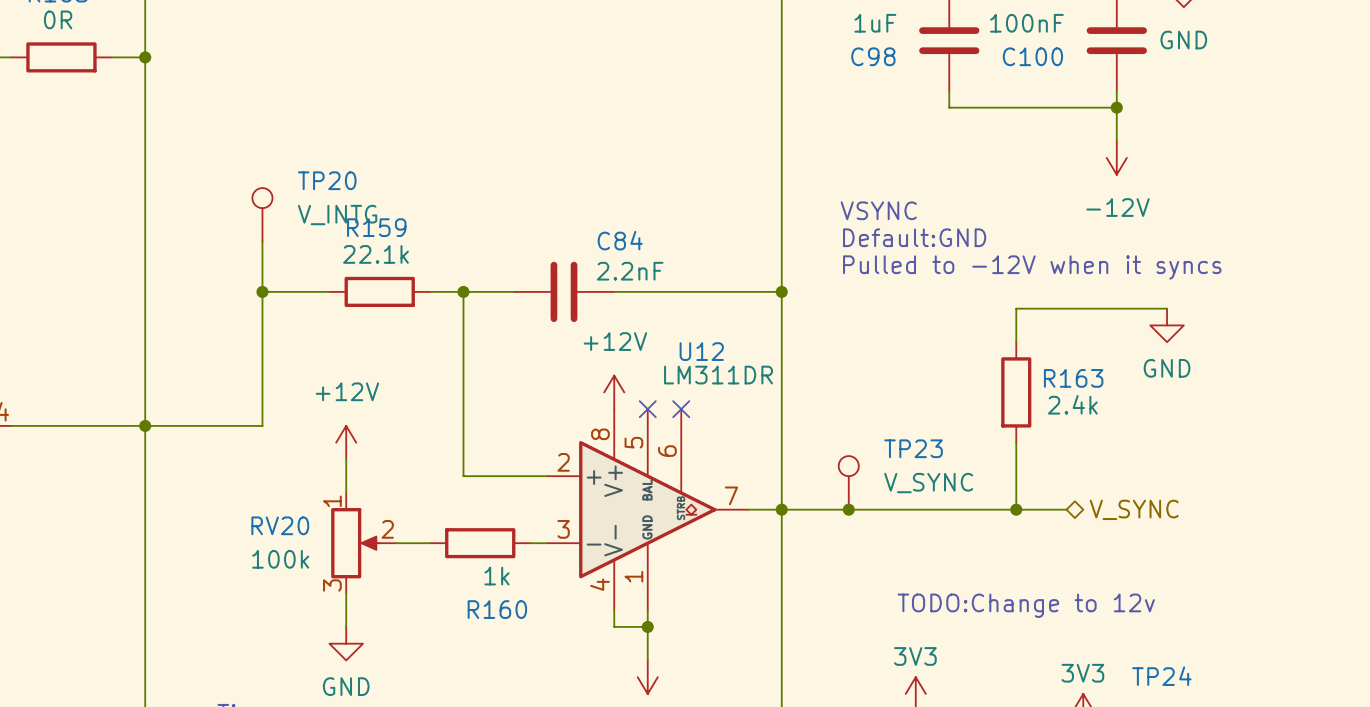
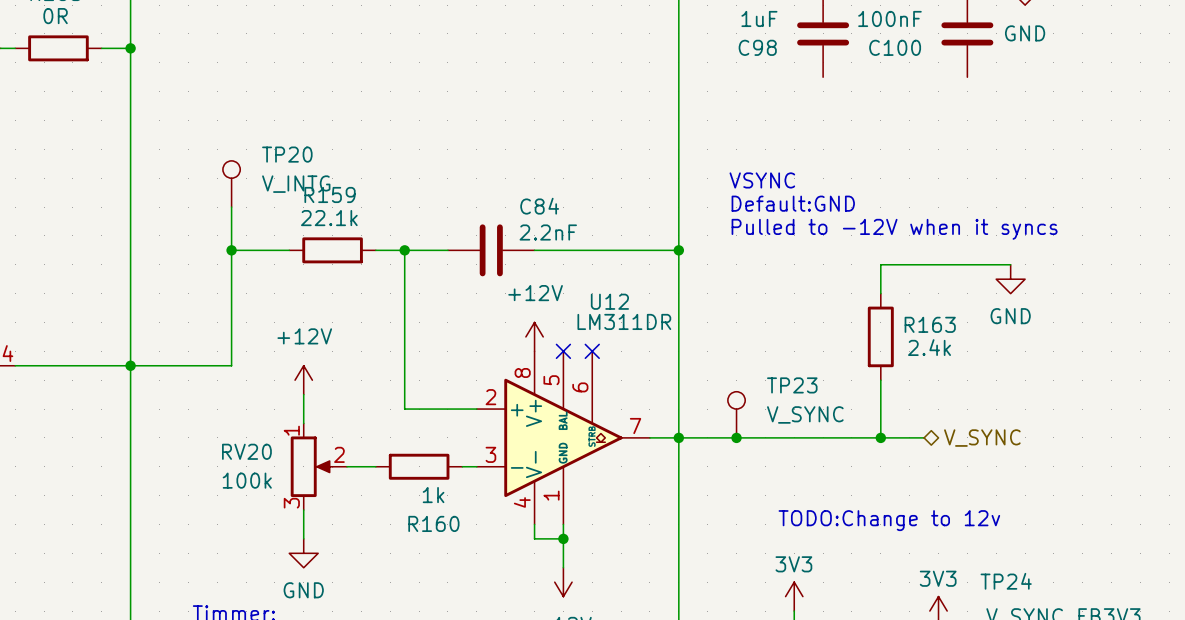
wire: (949, 90) (949, 107) (1116, 107) -> none
wire: (1116, 90) (1116, 141) -> none
junction: (1116, 107) -> none
power symbol: -12V (1116, 157) -> none

